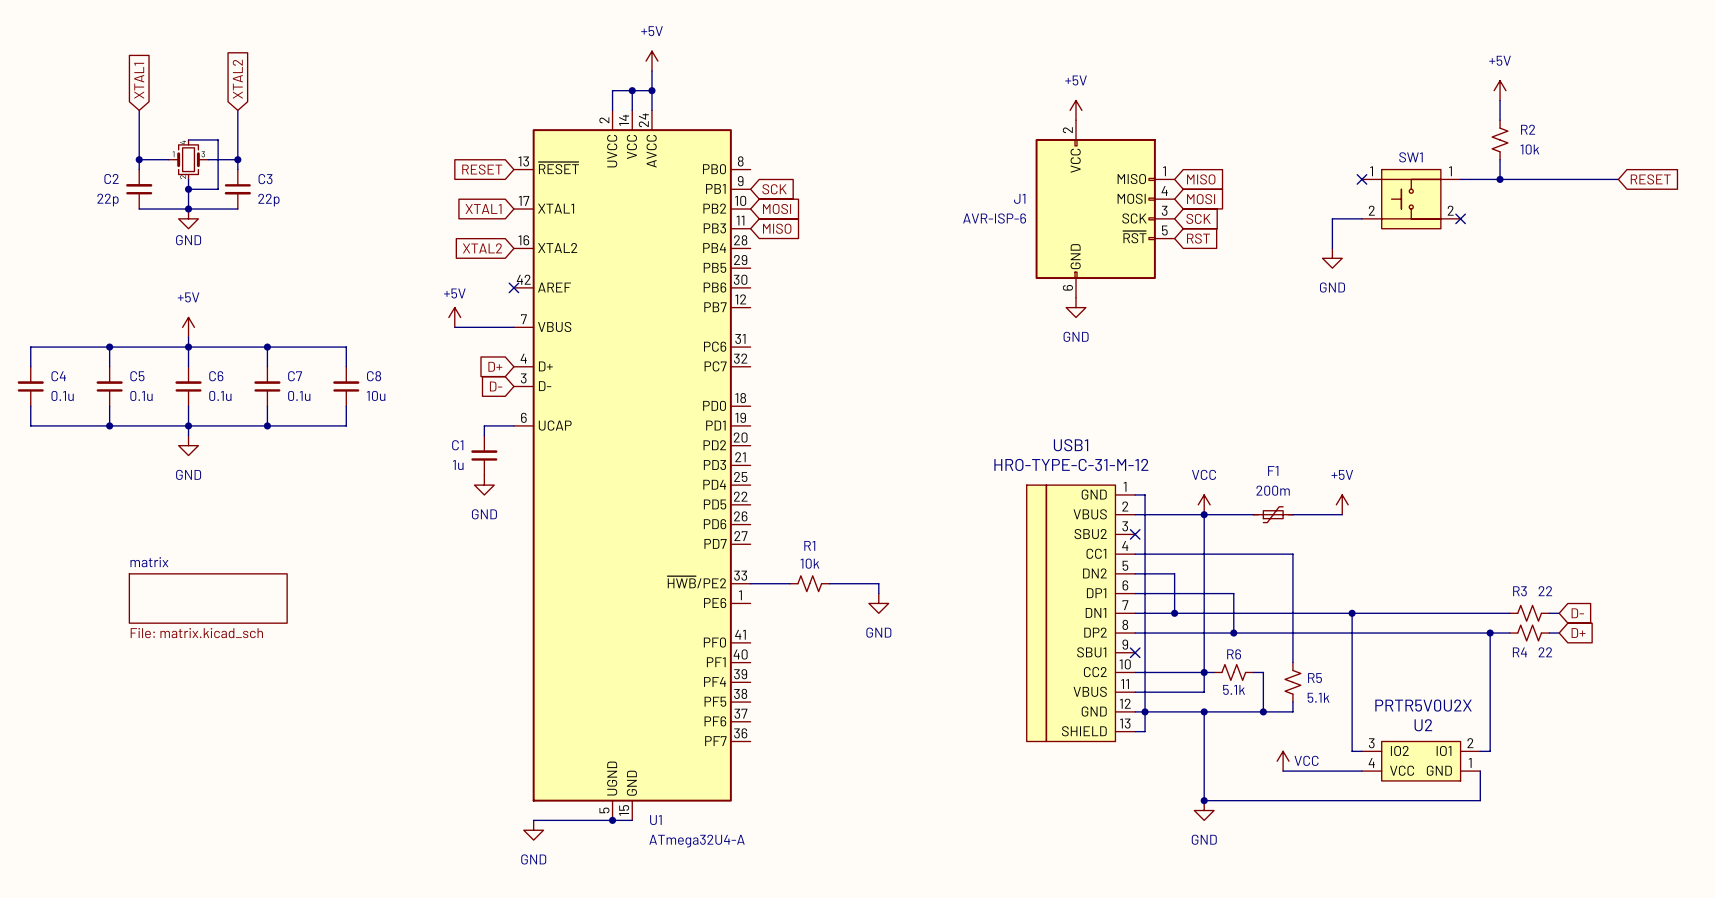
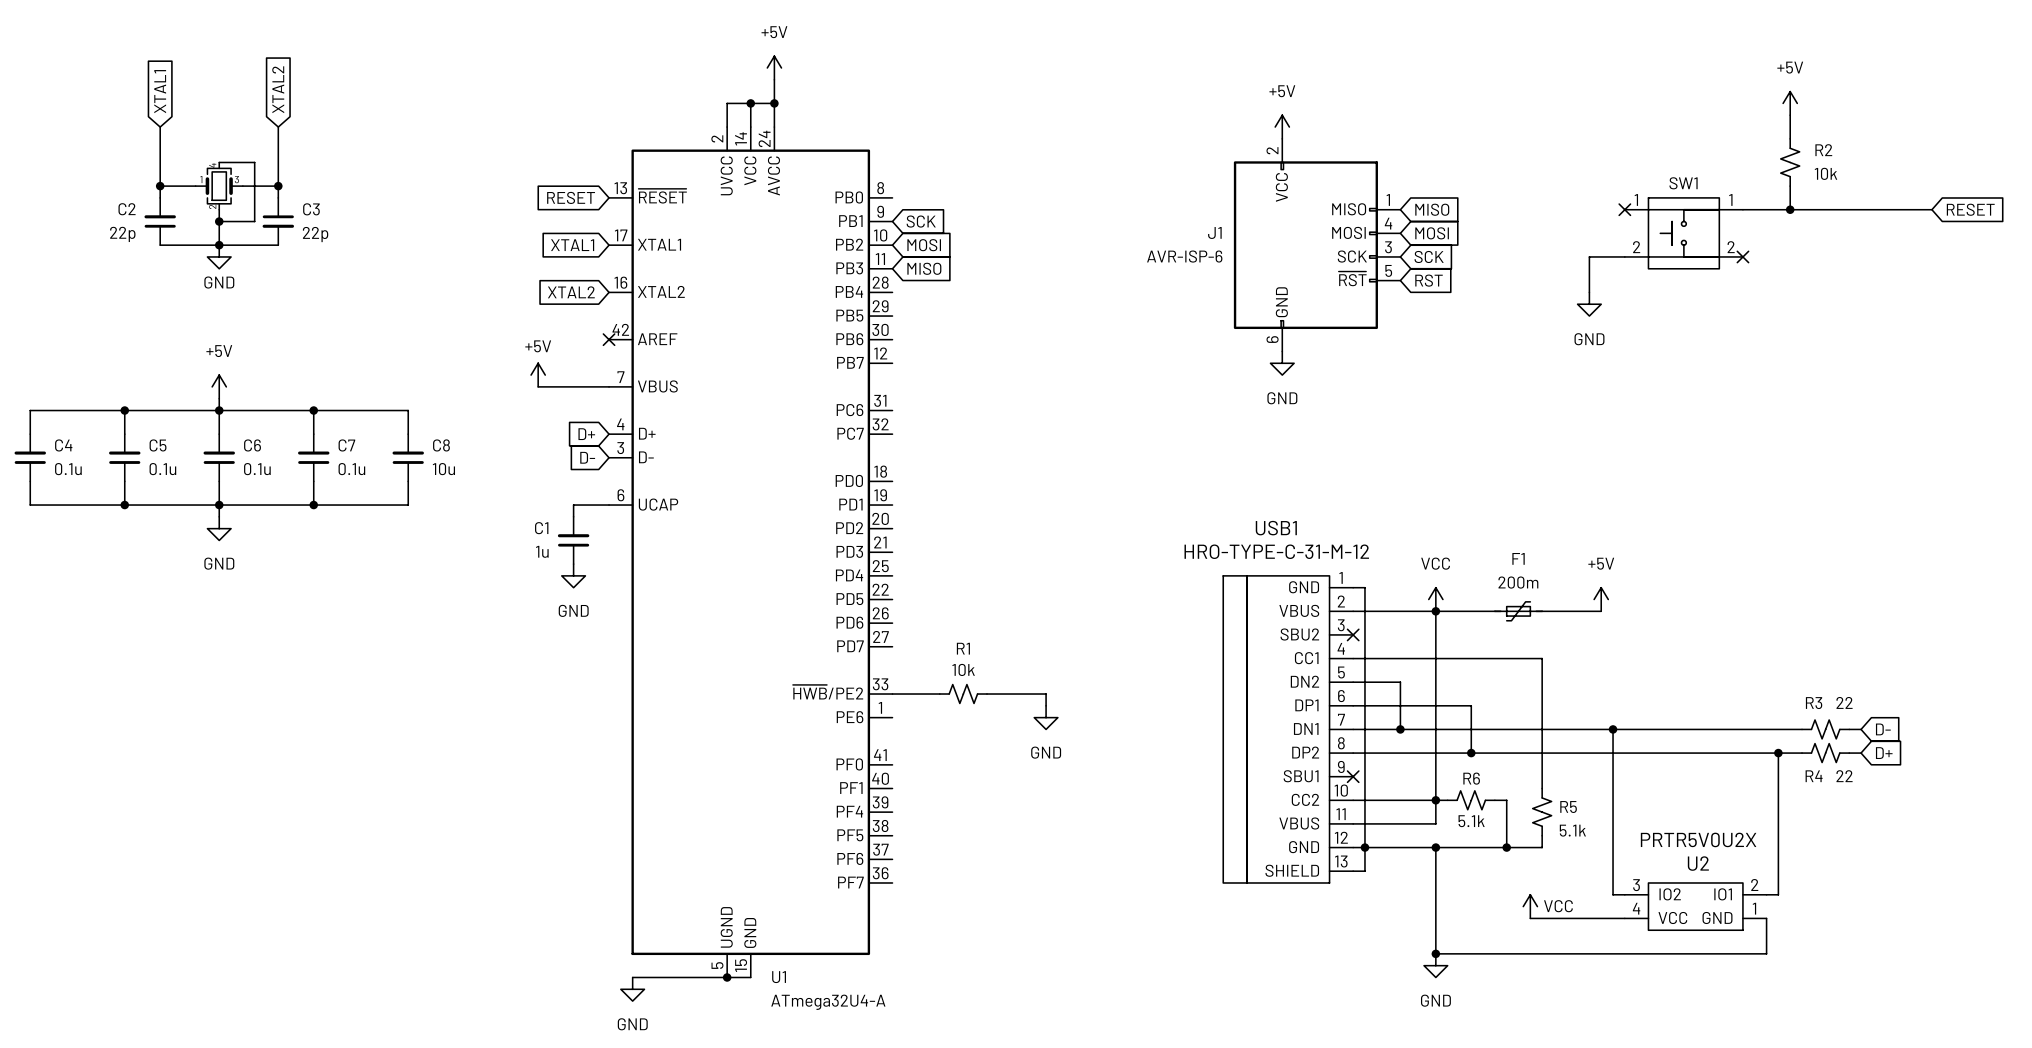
sheet matrix: File: matrix.kicad_sch (208, 598) -> none

